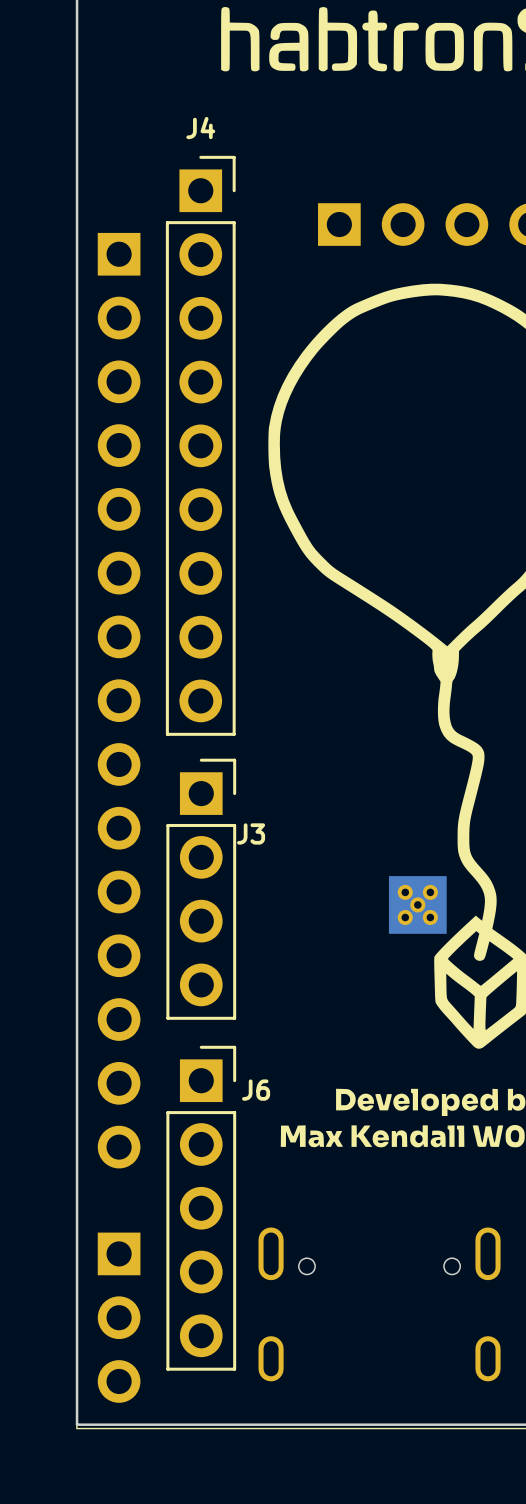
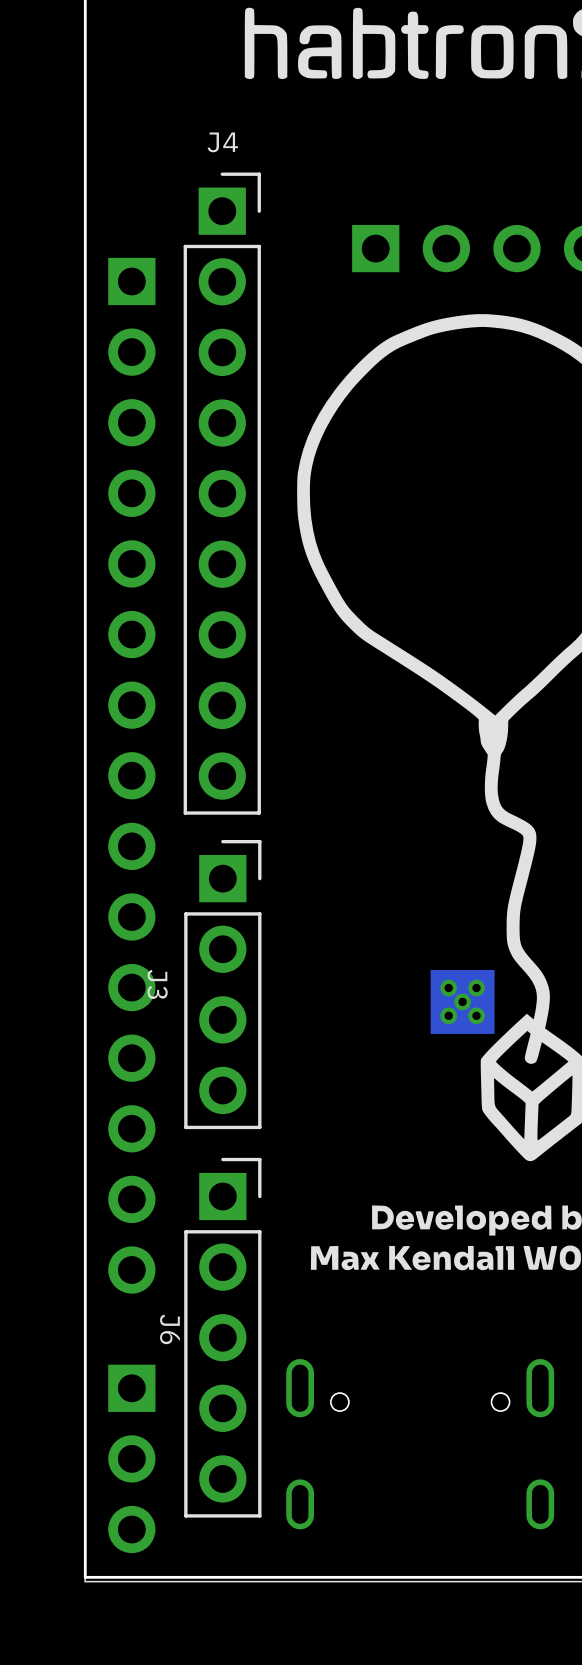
J3 name rotation: 0° (251, 833) -> 90° clockwise (157, 984)
J3 name position: J3 (251, 833) -> J3 (157, 984)
J6 name rotation: 0° (256, 1090) -> 90° clockwise (169, 1329)
J6 name position: J6 (256, 1090) -> J6 (169, 1329)

